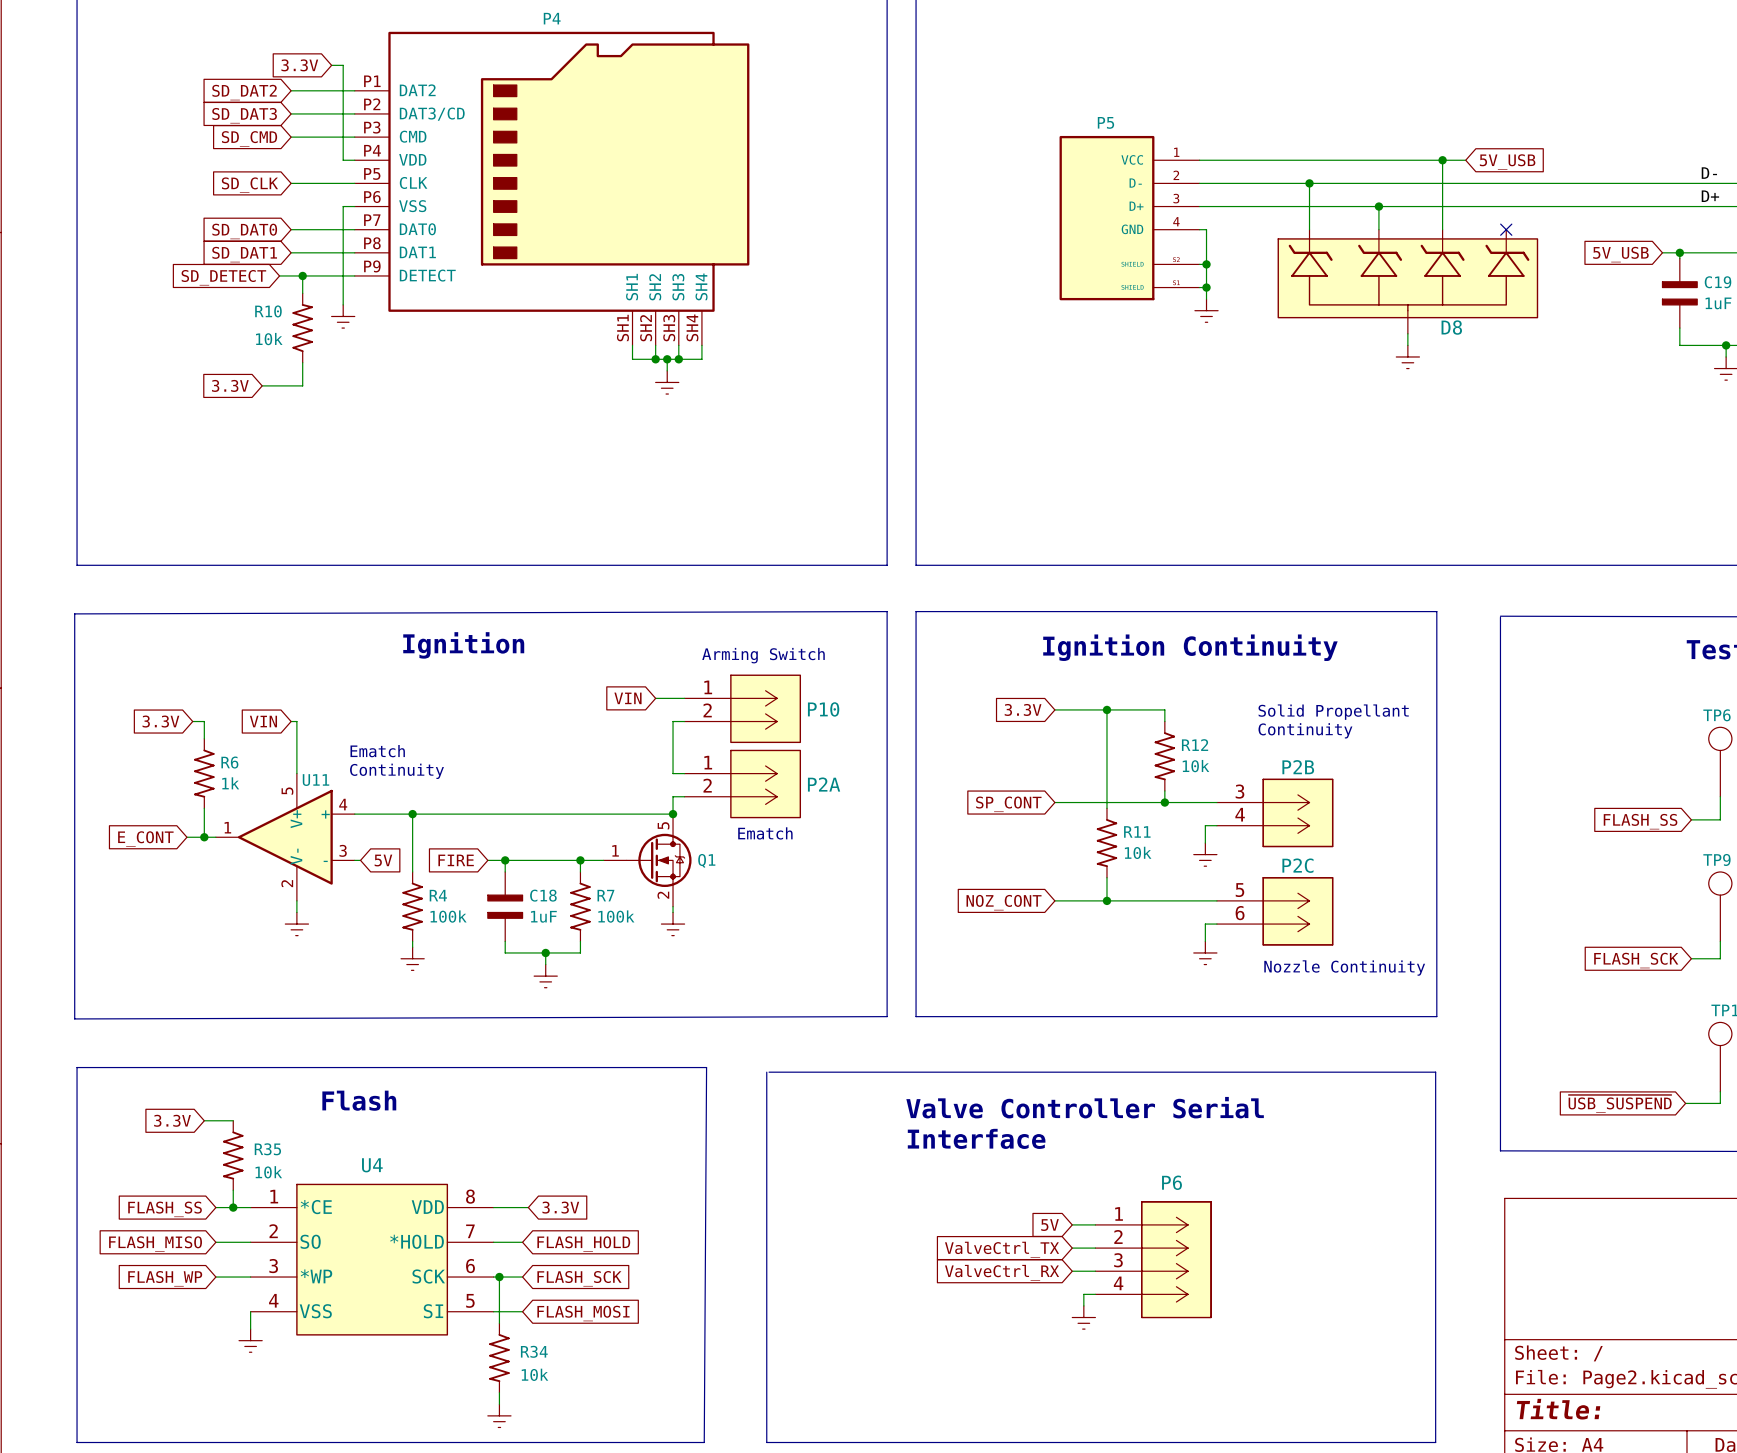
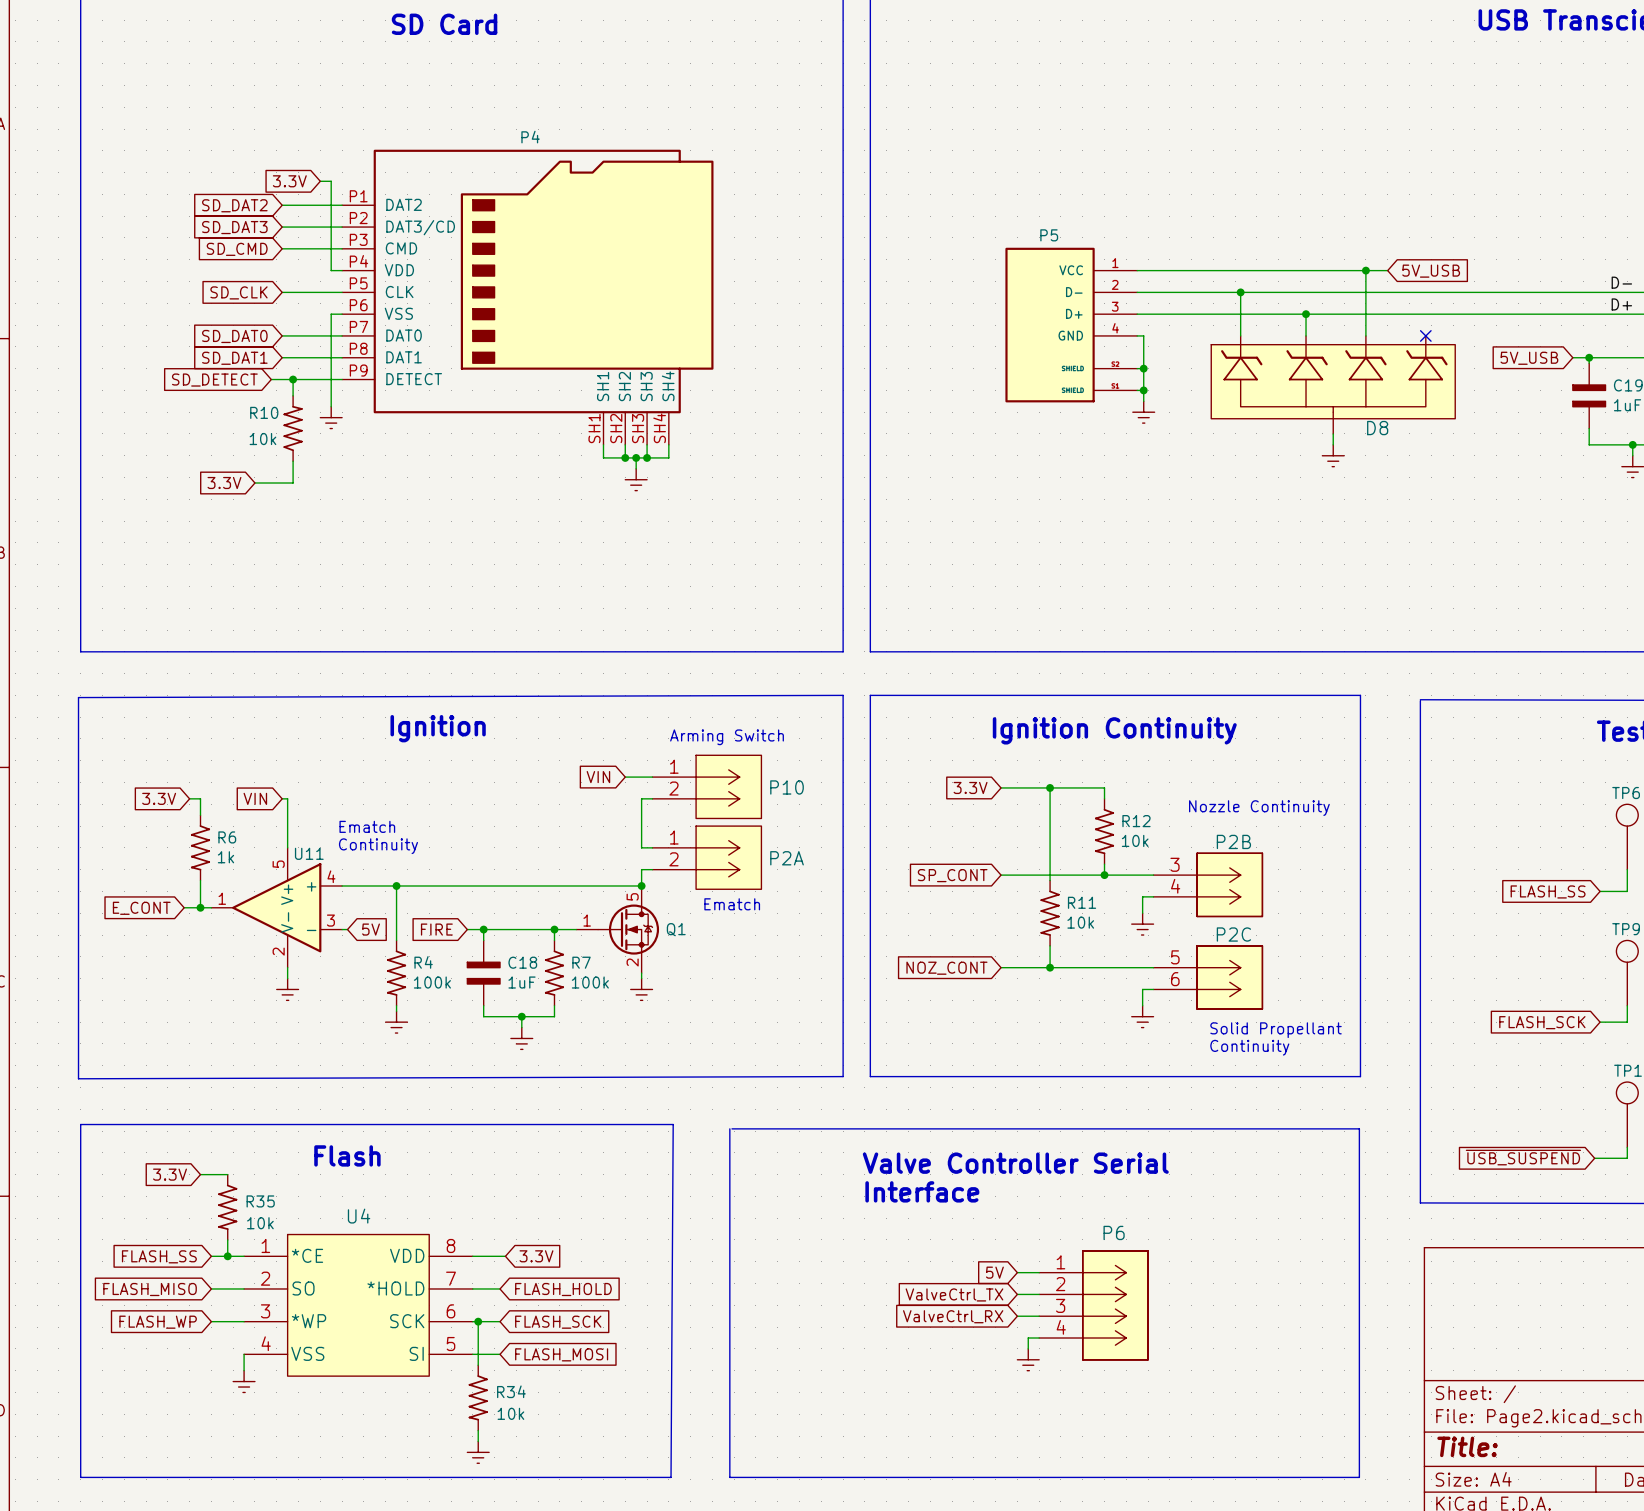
text: Solid Propellant (1333, 712) -> none
text: Continuity (1305, 730) -> Nozzle Continuity (1259, 808)
text: none -> Solid Propellant (1276, 1030)
text: Nozzle Continuity (1344, 968) -> Continuity (1249, 1047)

